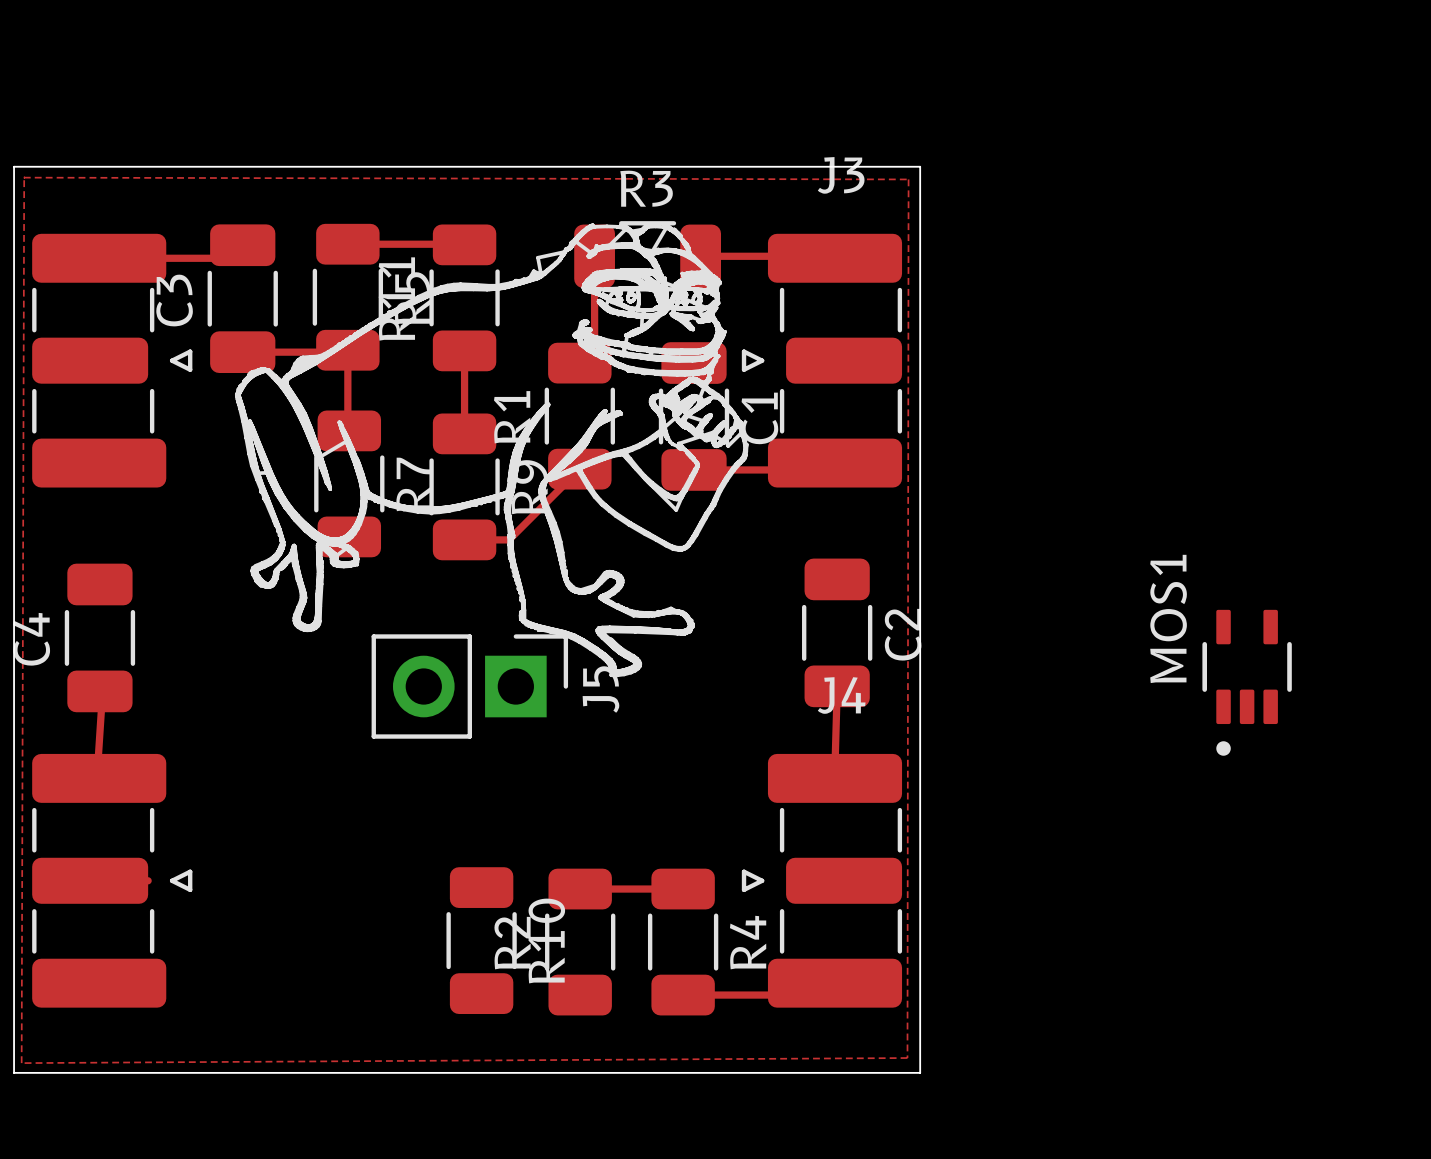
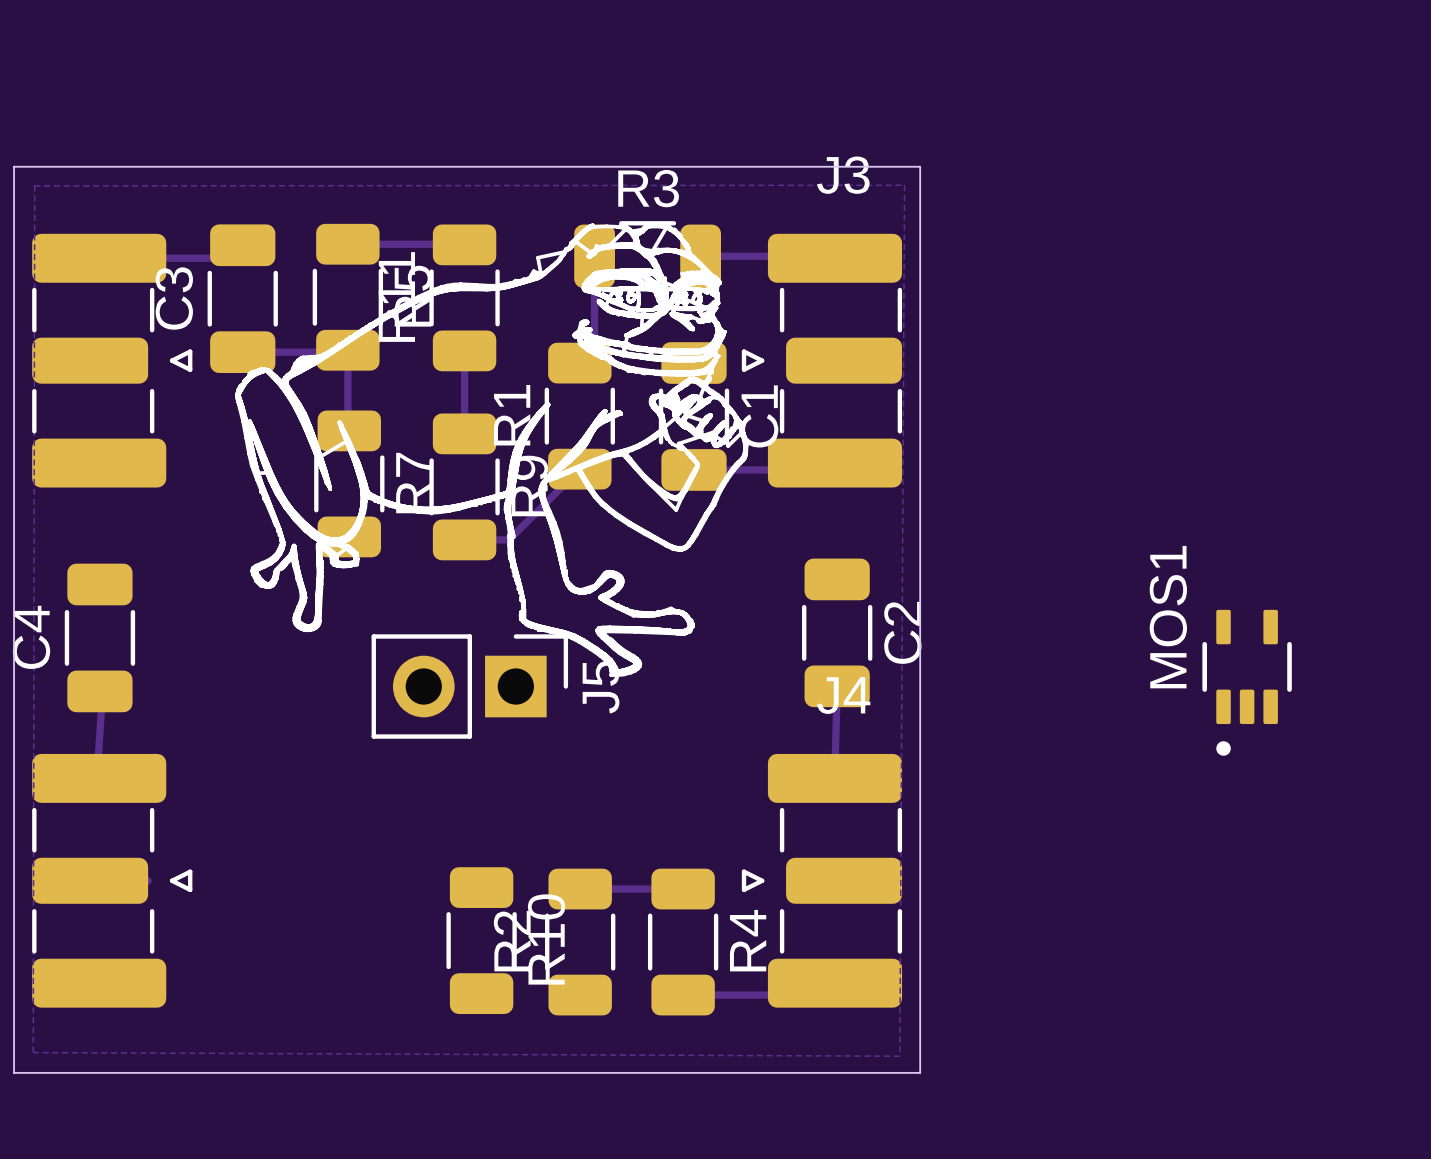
zone outline: (24, 177) (21, 1063) (907, 1058) (908, 179) (24, 177) -> (34, 185) (33, 1052) (899, 1056) (904, 185) (35, 185)

